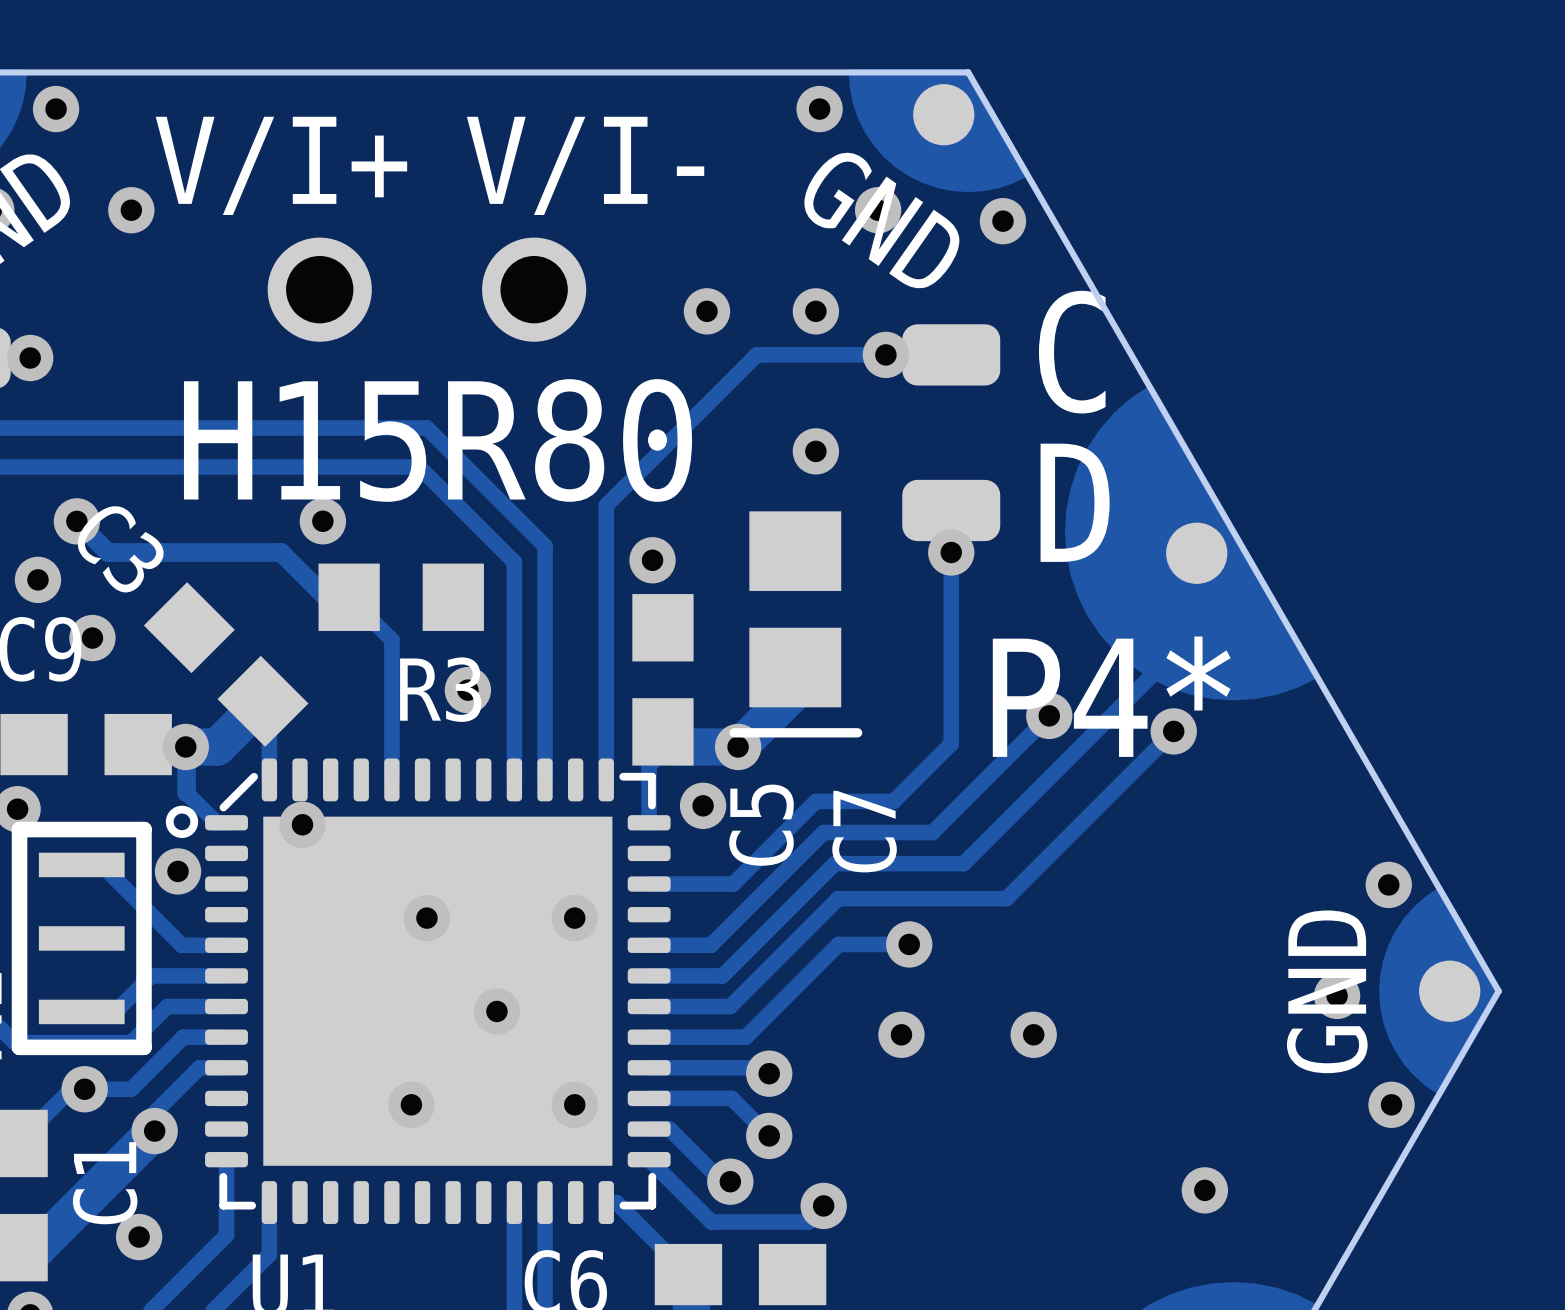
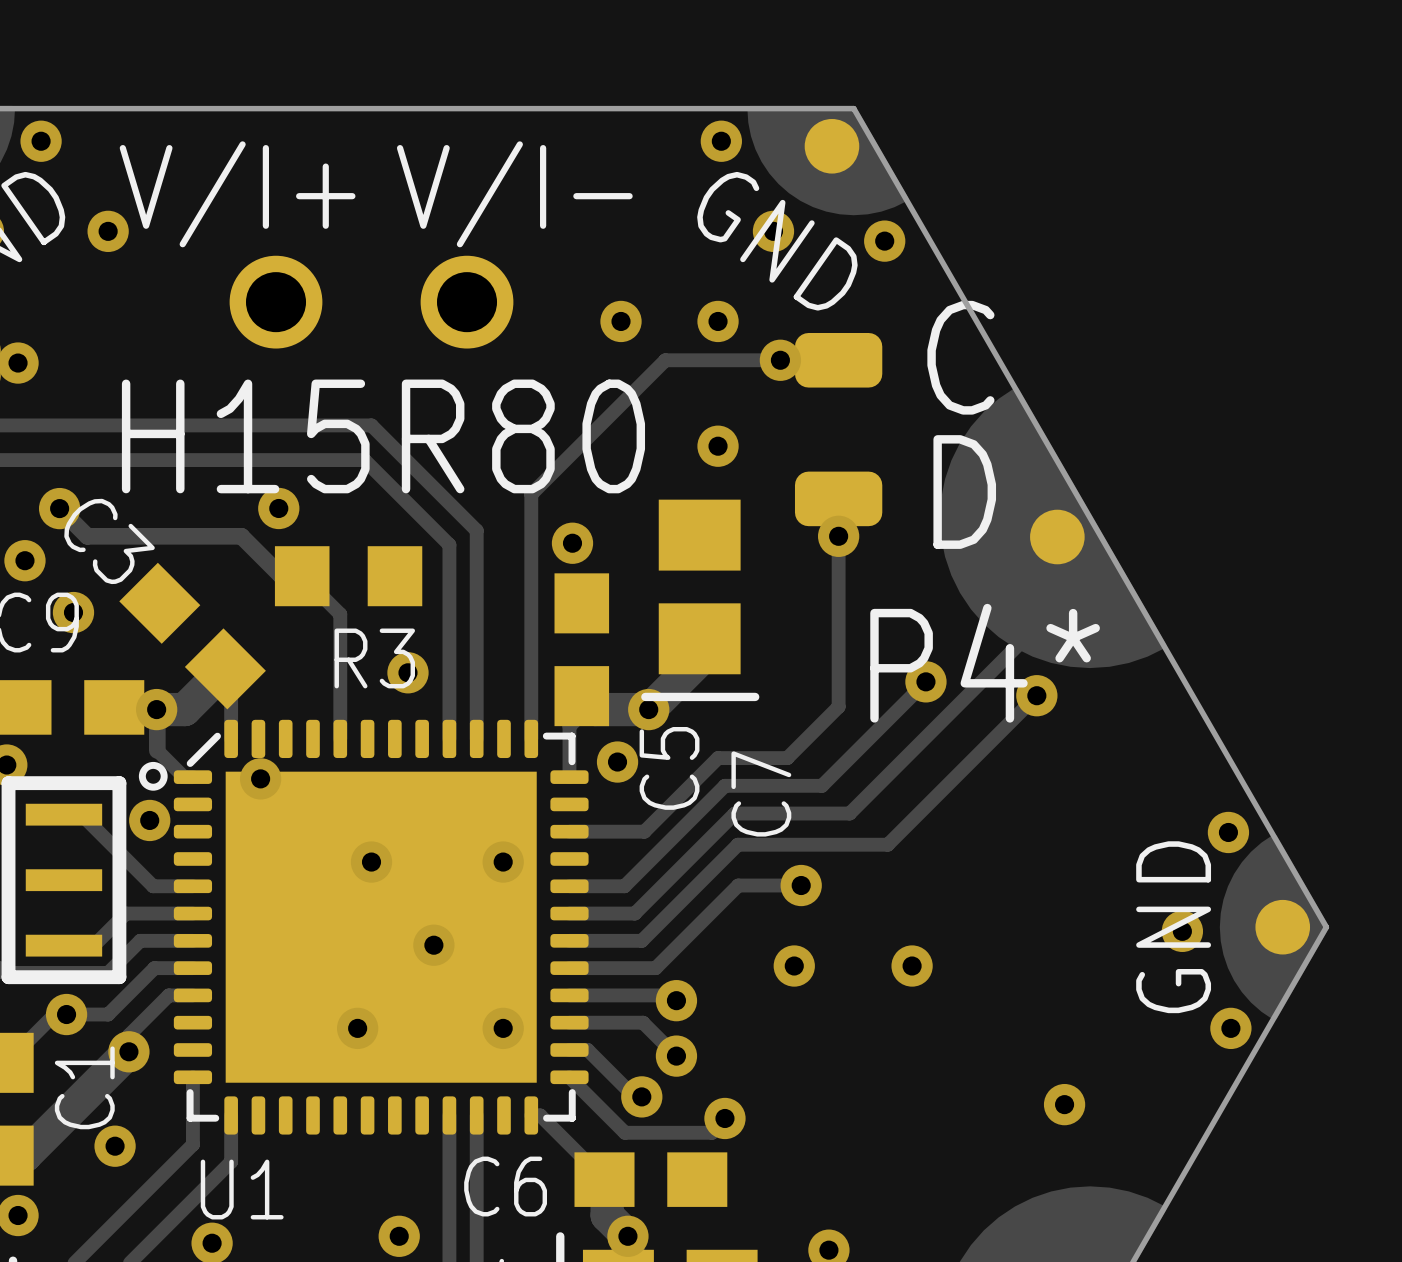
via position: (467, 690) -> (407, 672)

